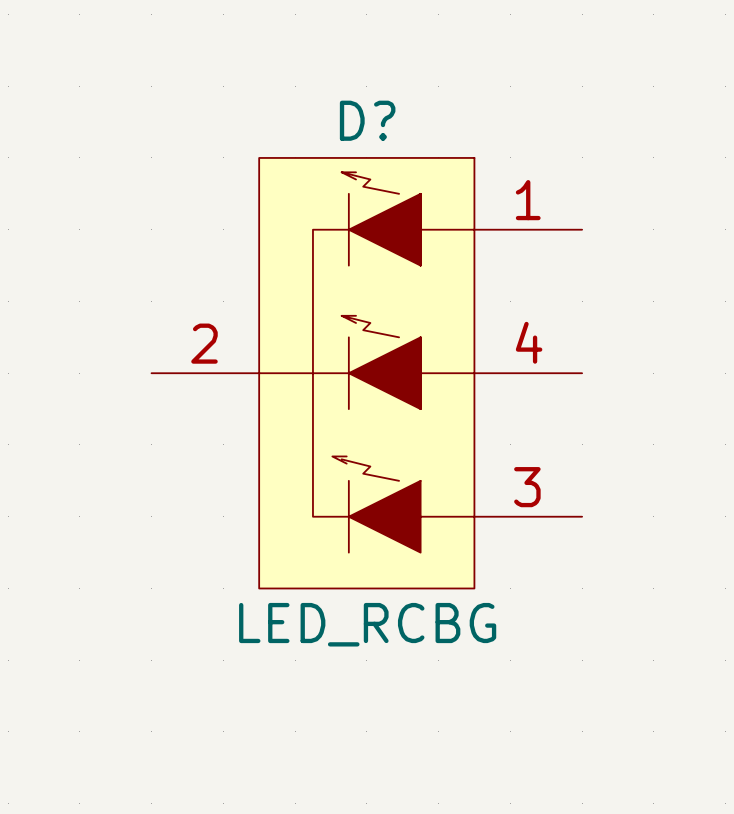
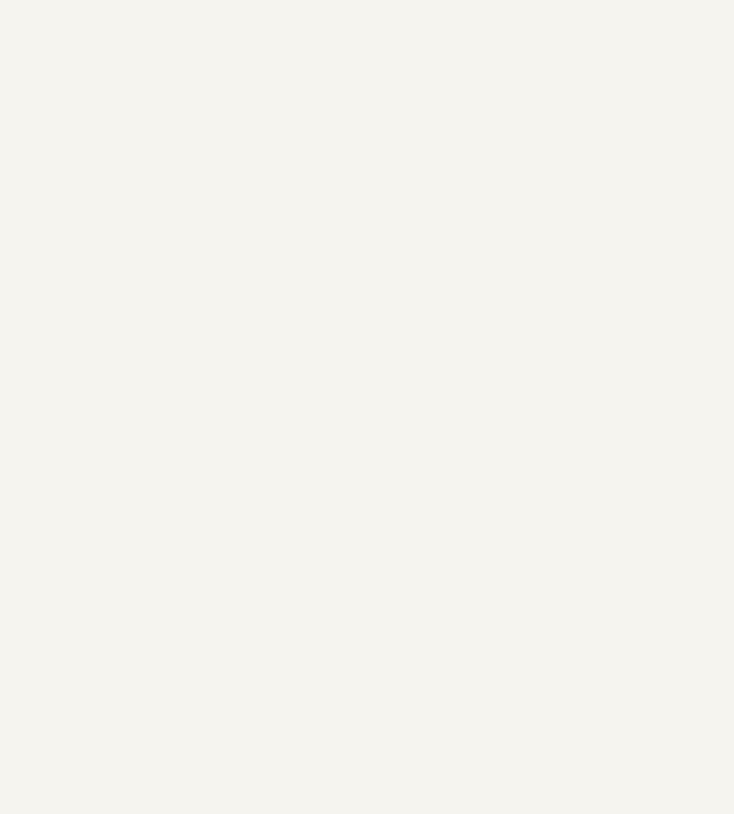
D?: LED_RCBG (366, 373) -> none

